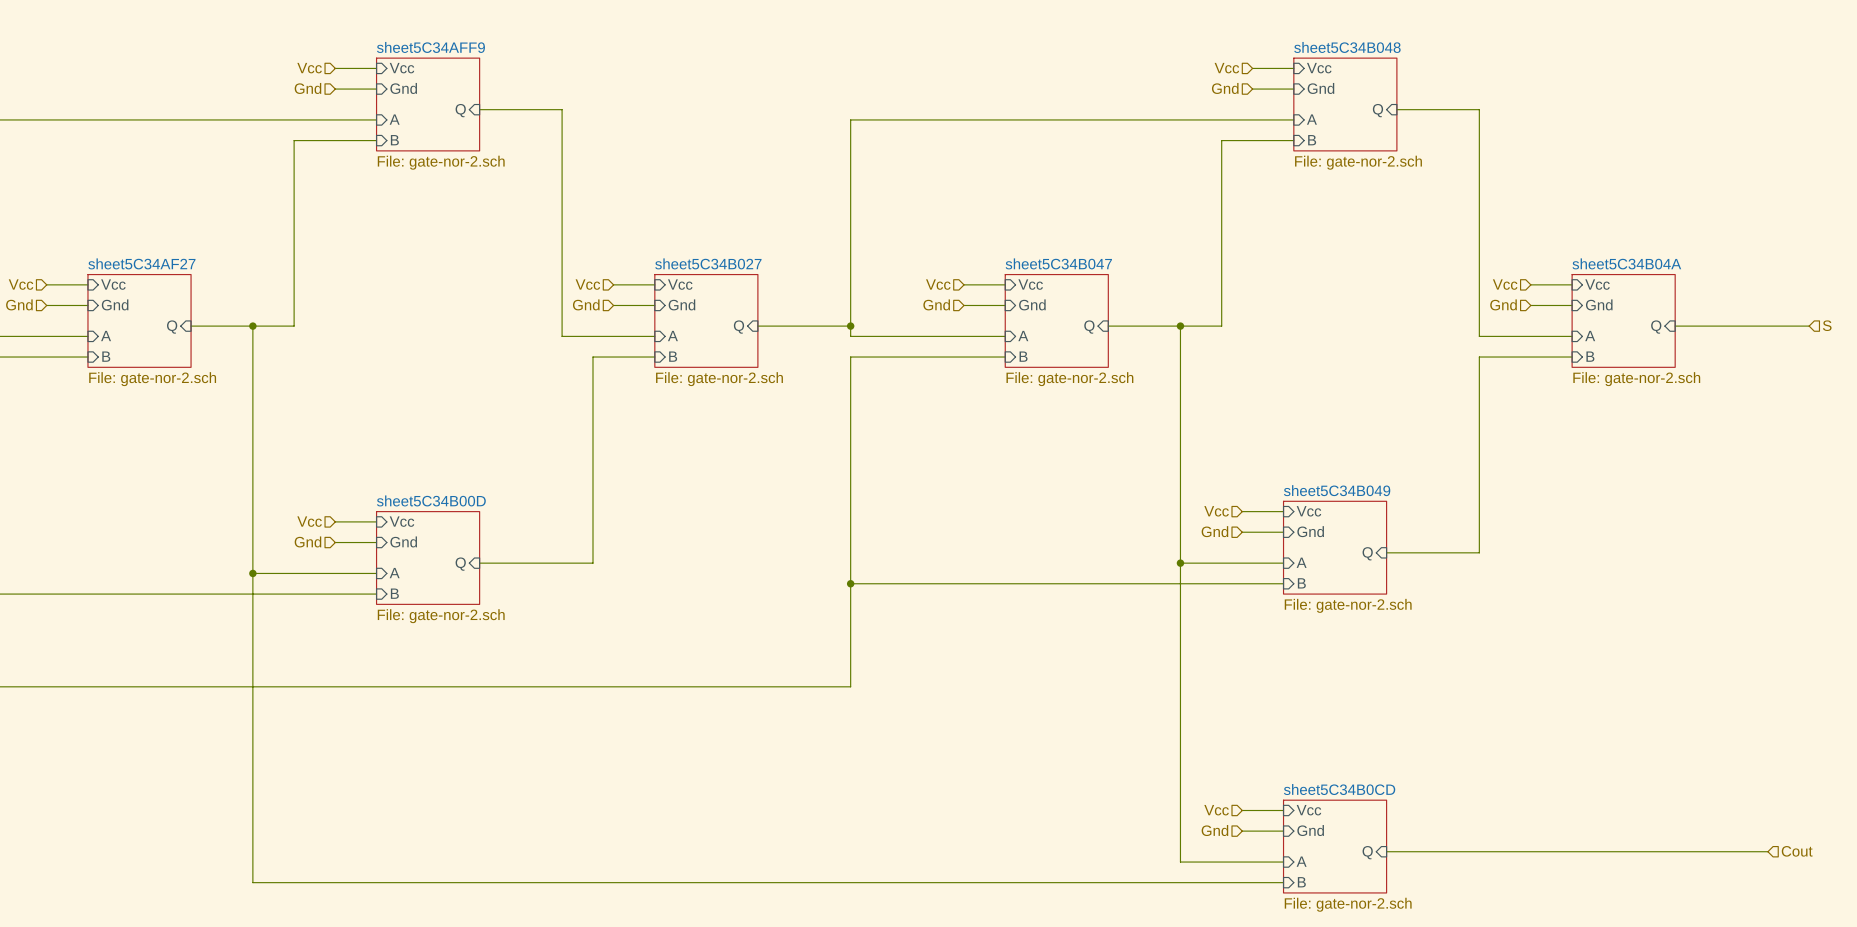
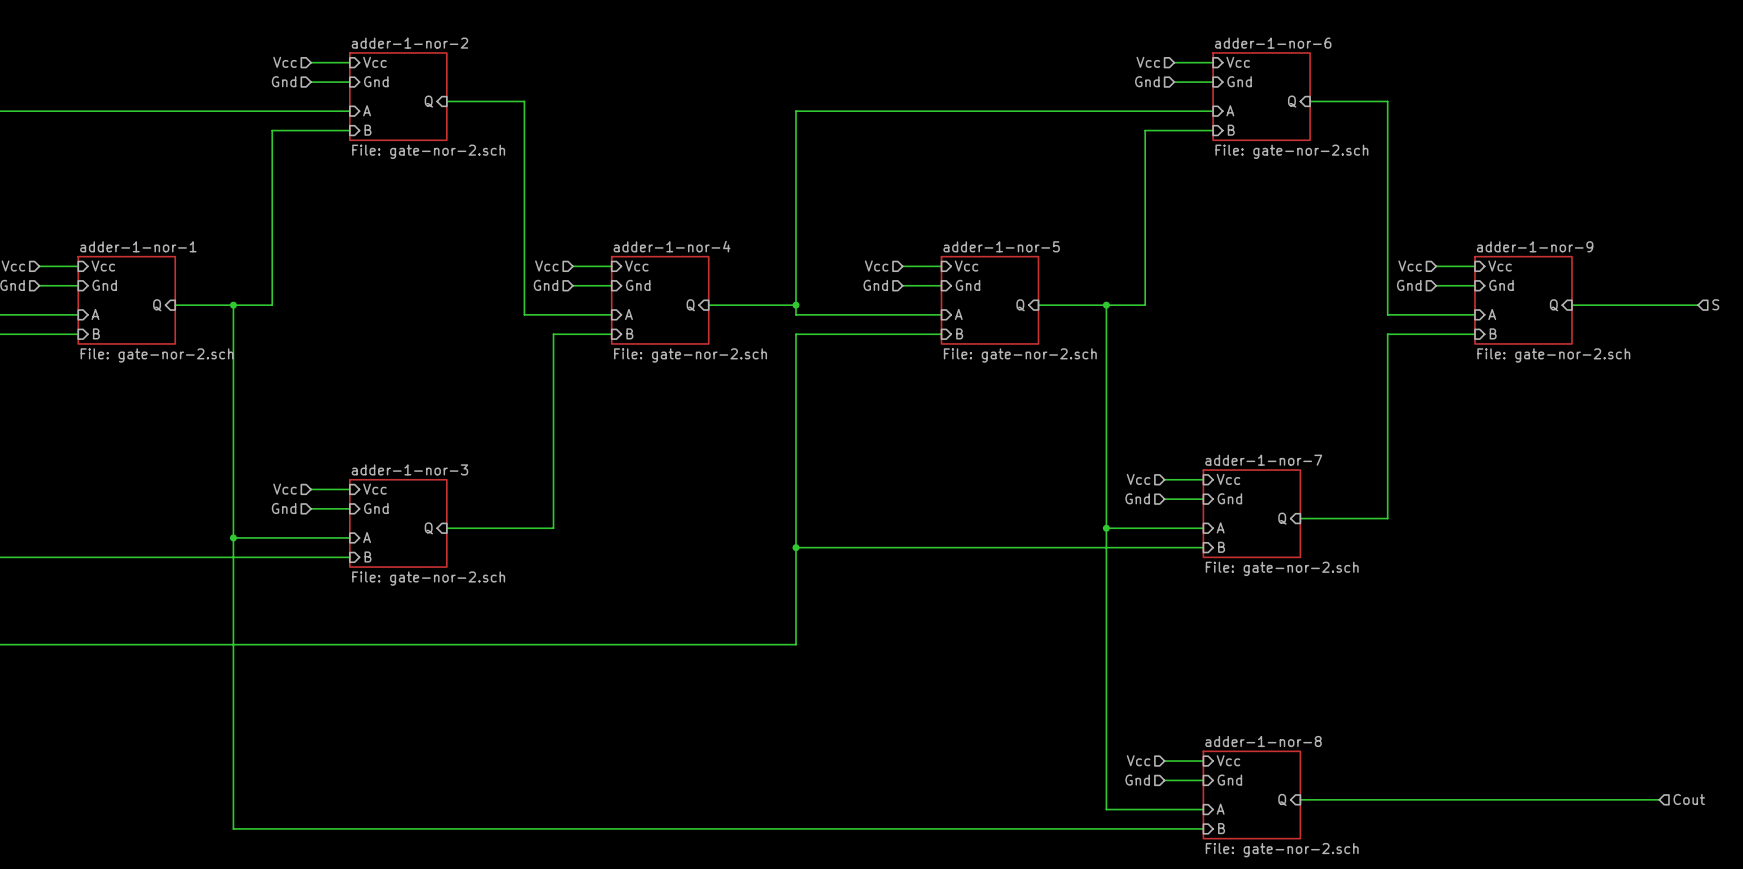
sheet sheet5C34AFF9 name: sheet5C34AFF9 (430, 47) -> adder-1-nor-2 (409, 43)
sheet sheet5C34B048 name: sheet5C34B048 (1347, 47) -> adder-1-nor-6 (1273, 43)
sheet sheet5C34AF27 name: sheet5C34AF27 (141, 263) -> adder-1-nor-1 (138, 246)
sheet sheet5C34B027 name: sheet5C34B027 (708, 263) -> adder-1-nor-4 (672, 246)
sheet sheet5C34B047 name: sheet5C34B047 (1058, 263) -> adder-1-nor-5 (1001, 246)
sheet sheet5C34B04A name: sheet5C34B04A (1626, 263) -> adder-1-nor-9 (1535, 246)
sheet sheet5C34B049 name: sheet5C34B049 (1337, 490) -> adder-1-nor-7 (1263, 460)
sheet sheet5C34B00D name: sheet5C34B00D (431, 500) -> adder-1-nor-3 (409, 469)
sheet sheet5C34B0CD name: sheet5C34B0CD (1339, 789) -> adder-1-nor-8 (1263, 741)

